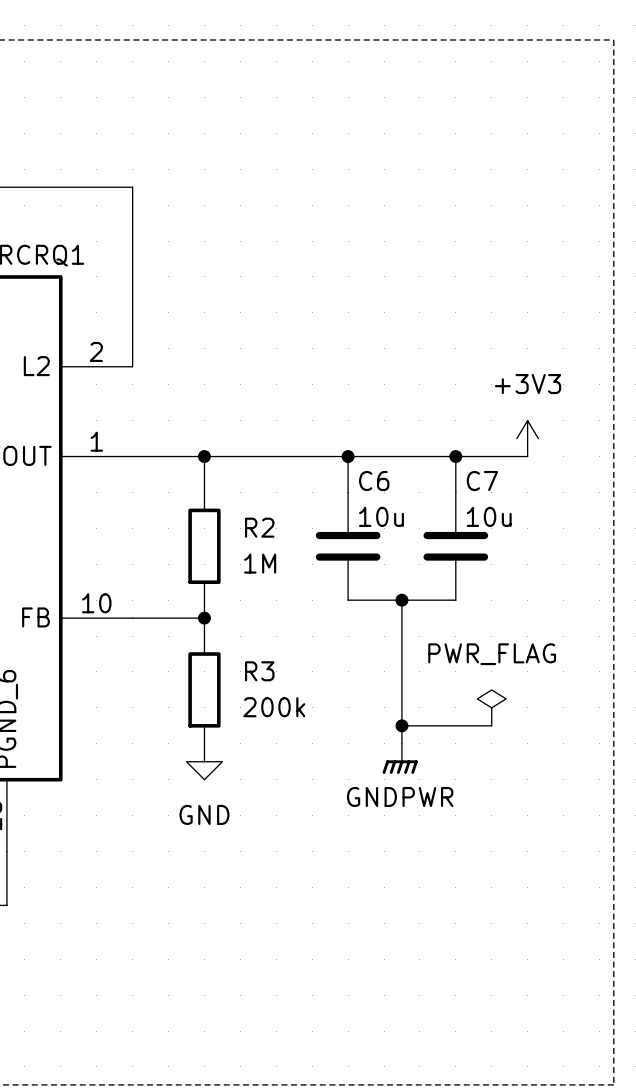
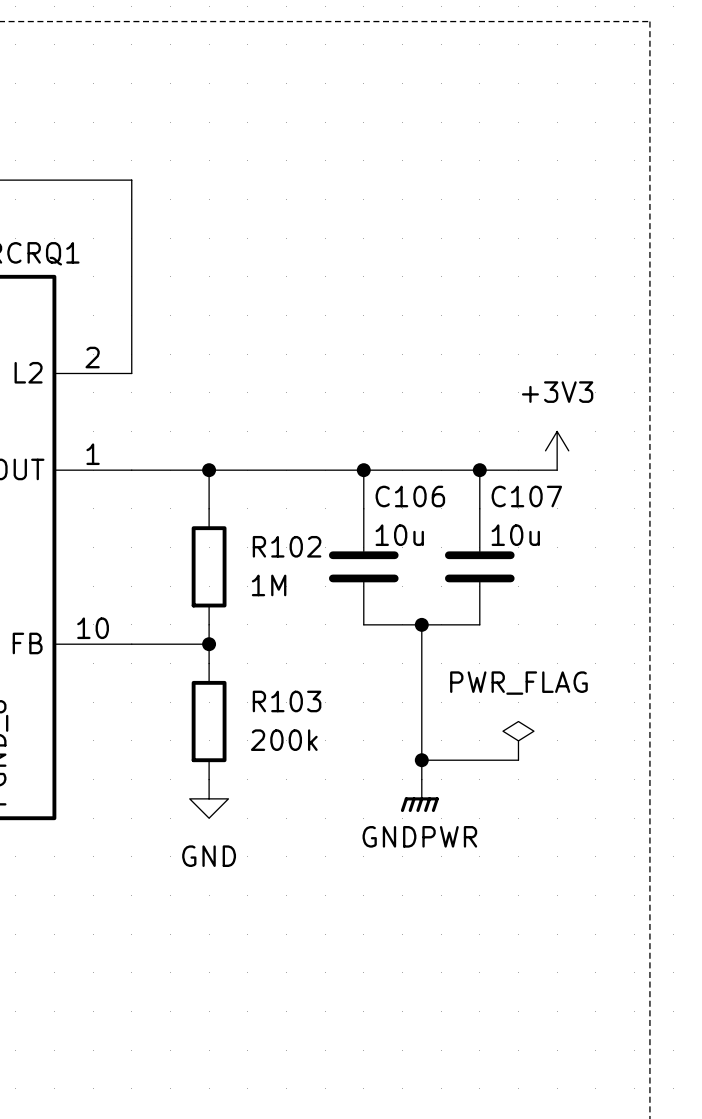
C6 name: C6 (374, 481) -> C106 (410, 496)
C7 name: C7 (482, 481) -> C107 (526, 496)
R2 name: R2 (259, 527) -> R102 (287, 546)
R3 name: R3 (259, 671) -> R103 (287, 701)

